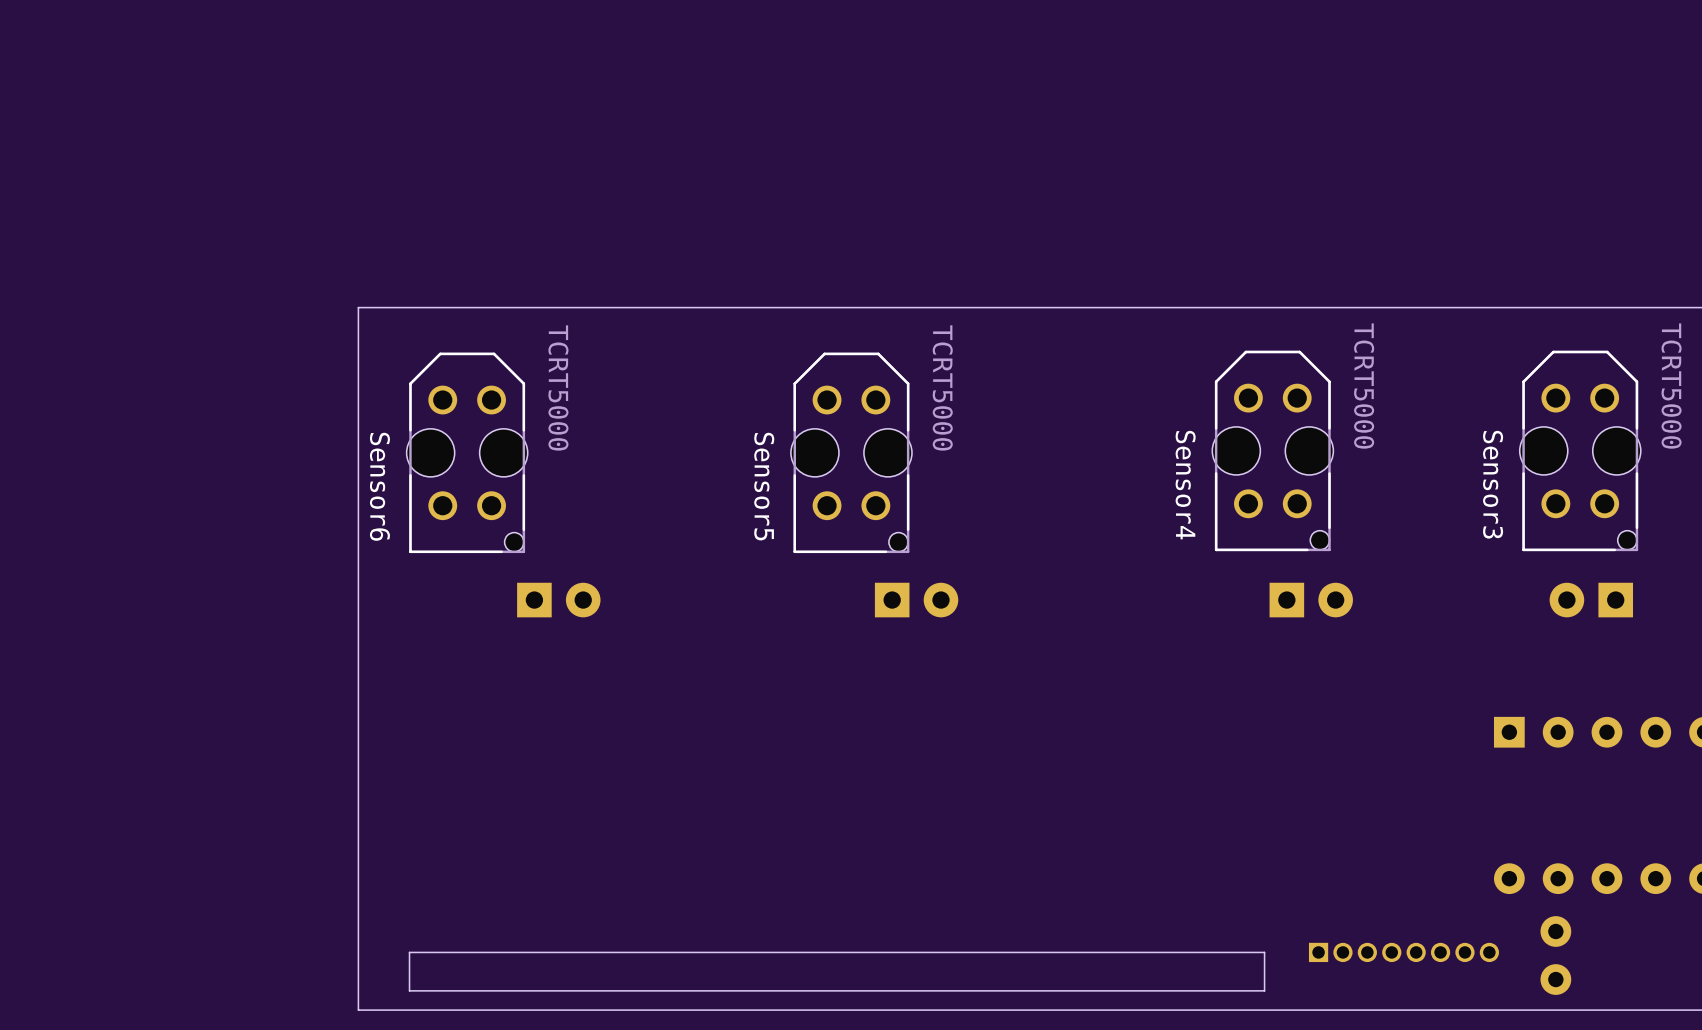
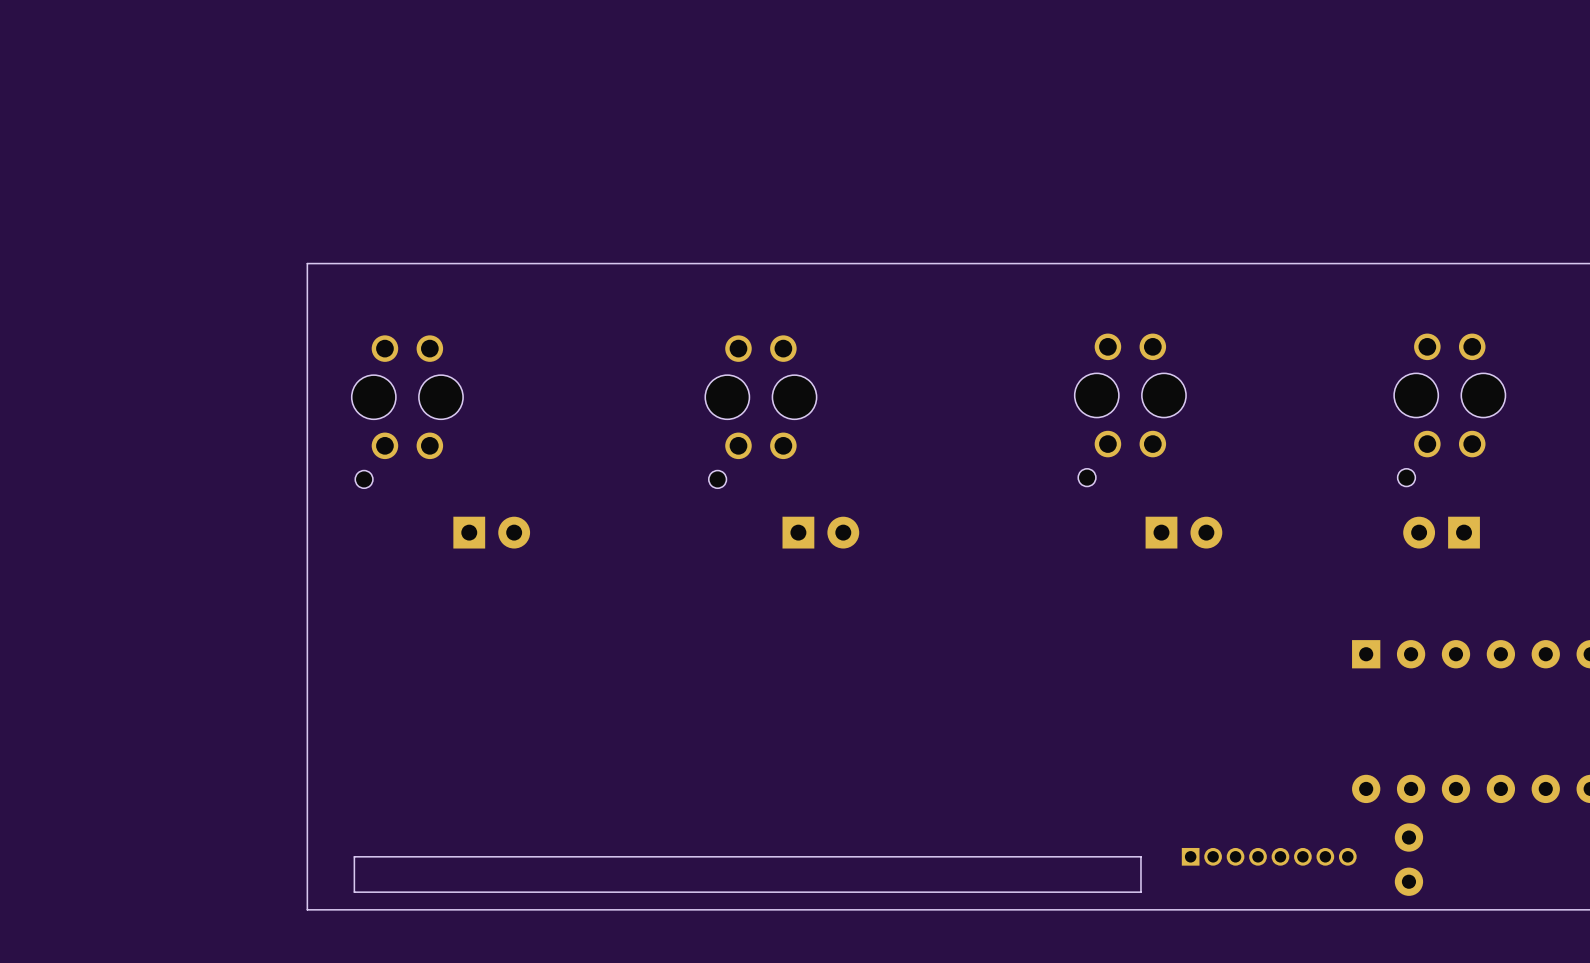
Sensor4 side: bottom (1272, 450) -> top (1130, 410)
Sensor3 side: bottom (1580, 450) -> top (1449, 410)
Sensor6 side: bottom (467, 452) -> top (407, 411)
Sensor5 side: bottom (851, 452) -> top (760, 411)

